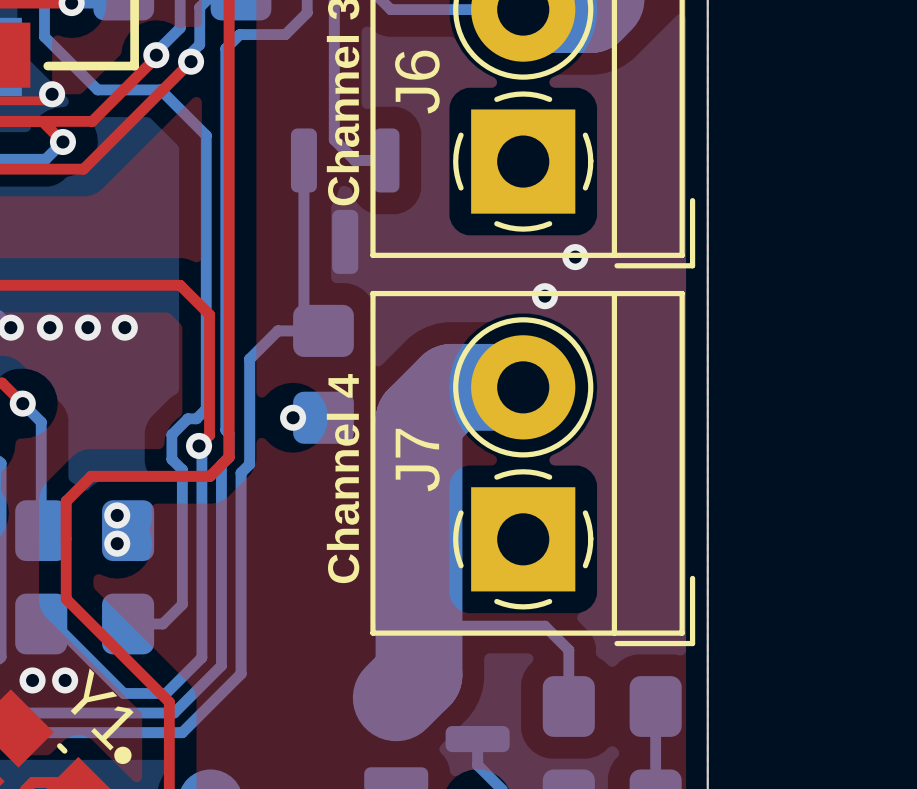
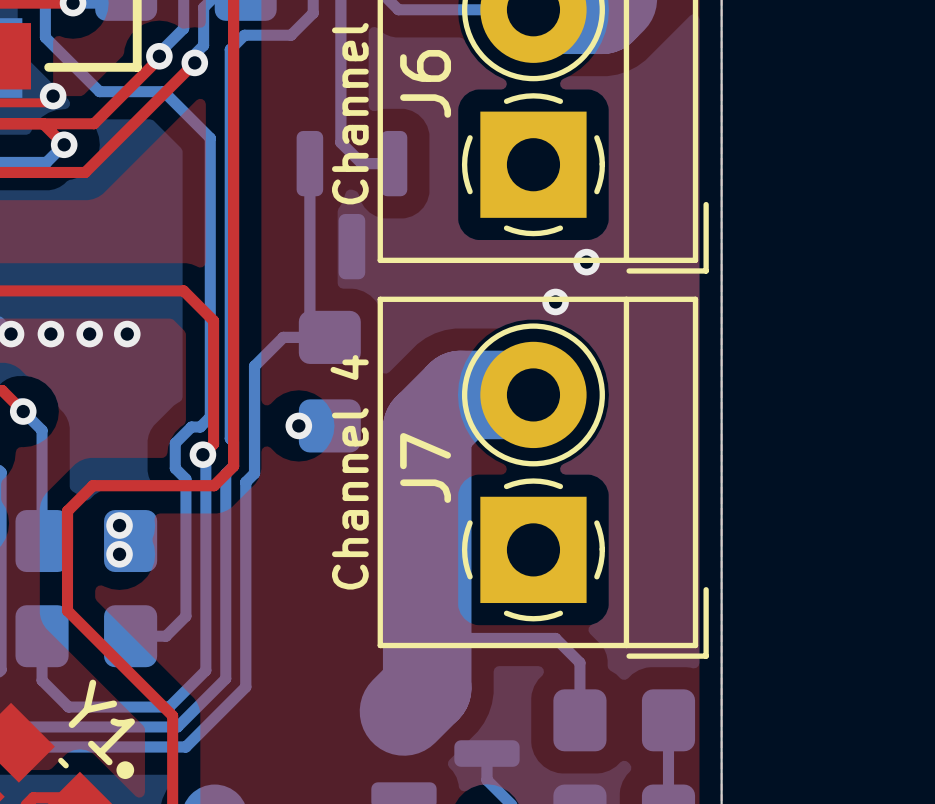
bottom track: (41, 624) (54, 624) (123, 693) -> (42, 636) (42, 680) (68, 707) (126, 707)
via: (32, 680) -> none
via: (65, 680) -> none

